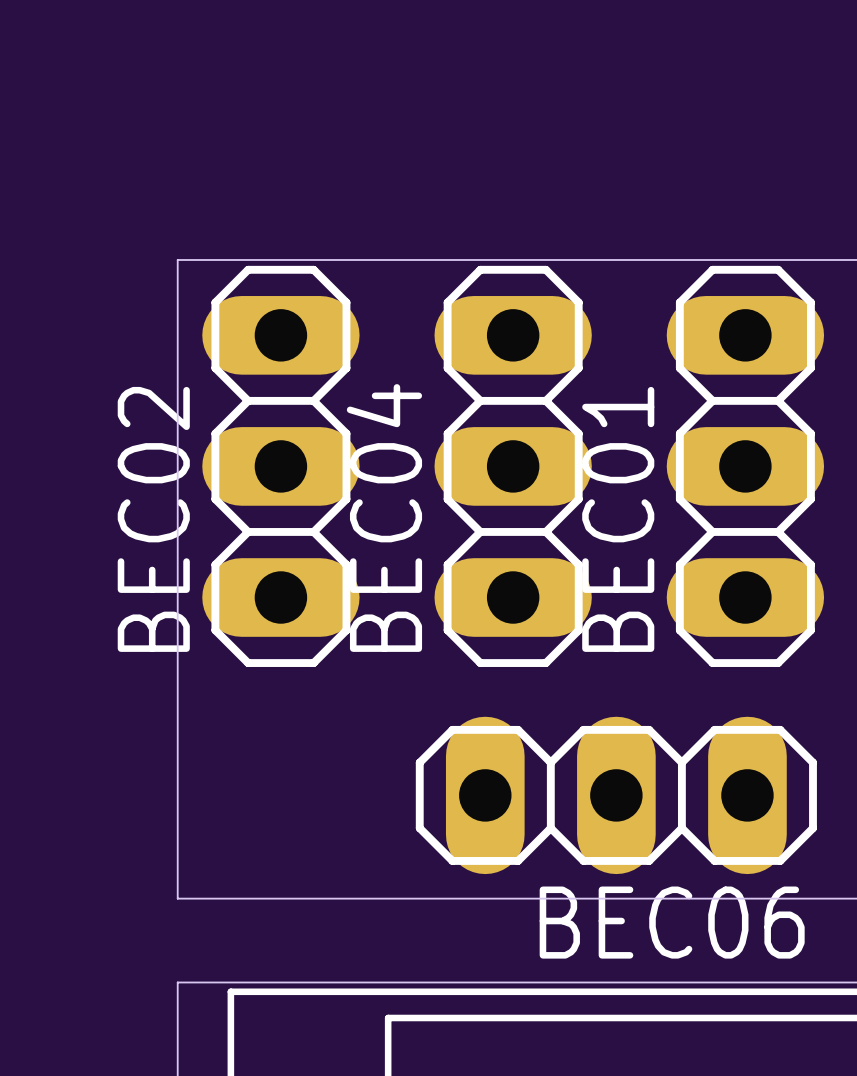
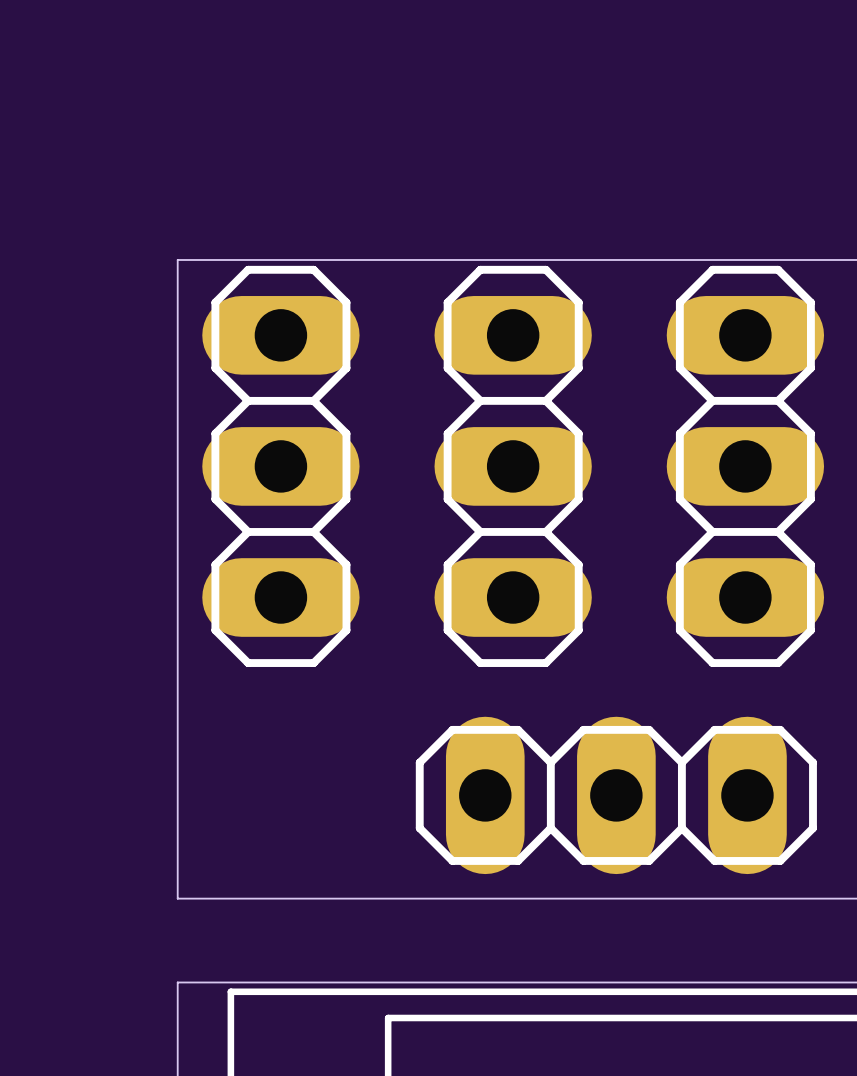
BEC04 name: BEC04 (384, 518) -> none
BEC02 name: BEC02 (153, 519) -> none
BEC01 name: BEC01 (618, 519) -> none
BEC06 name: BEC06 (672, 922) -> none

